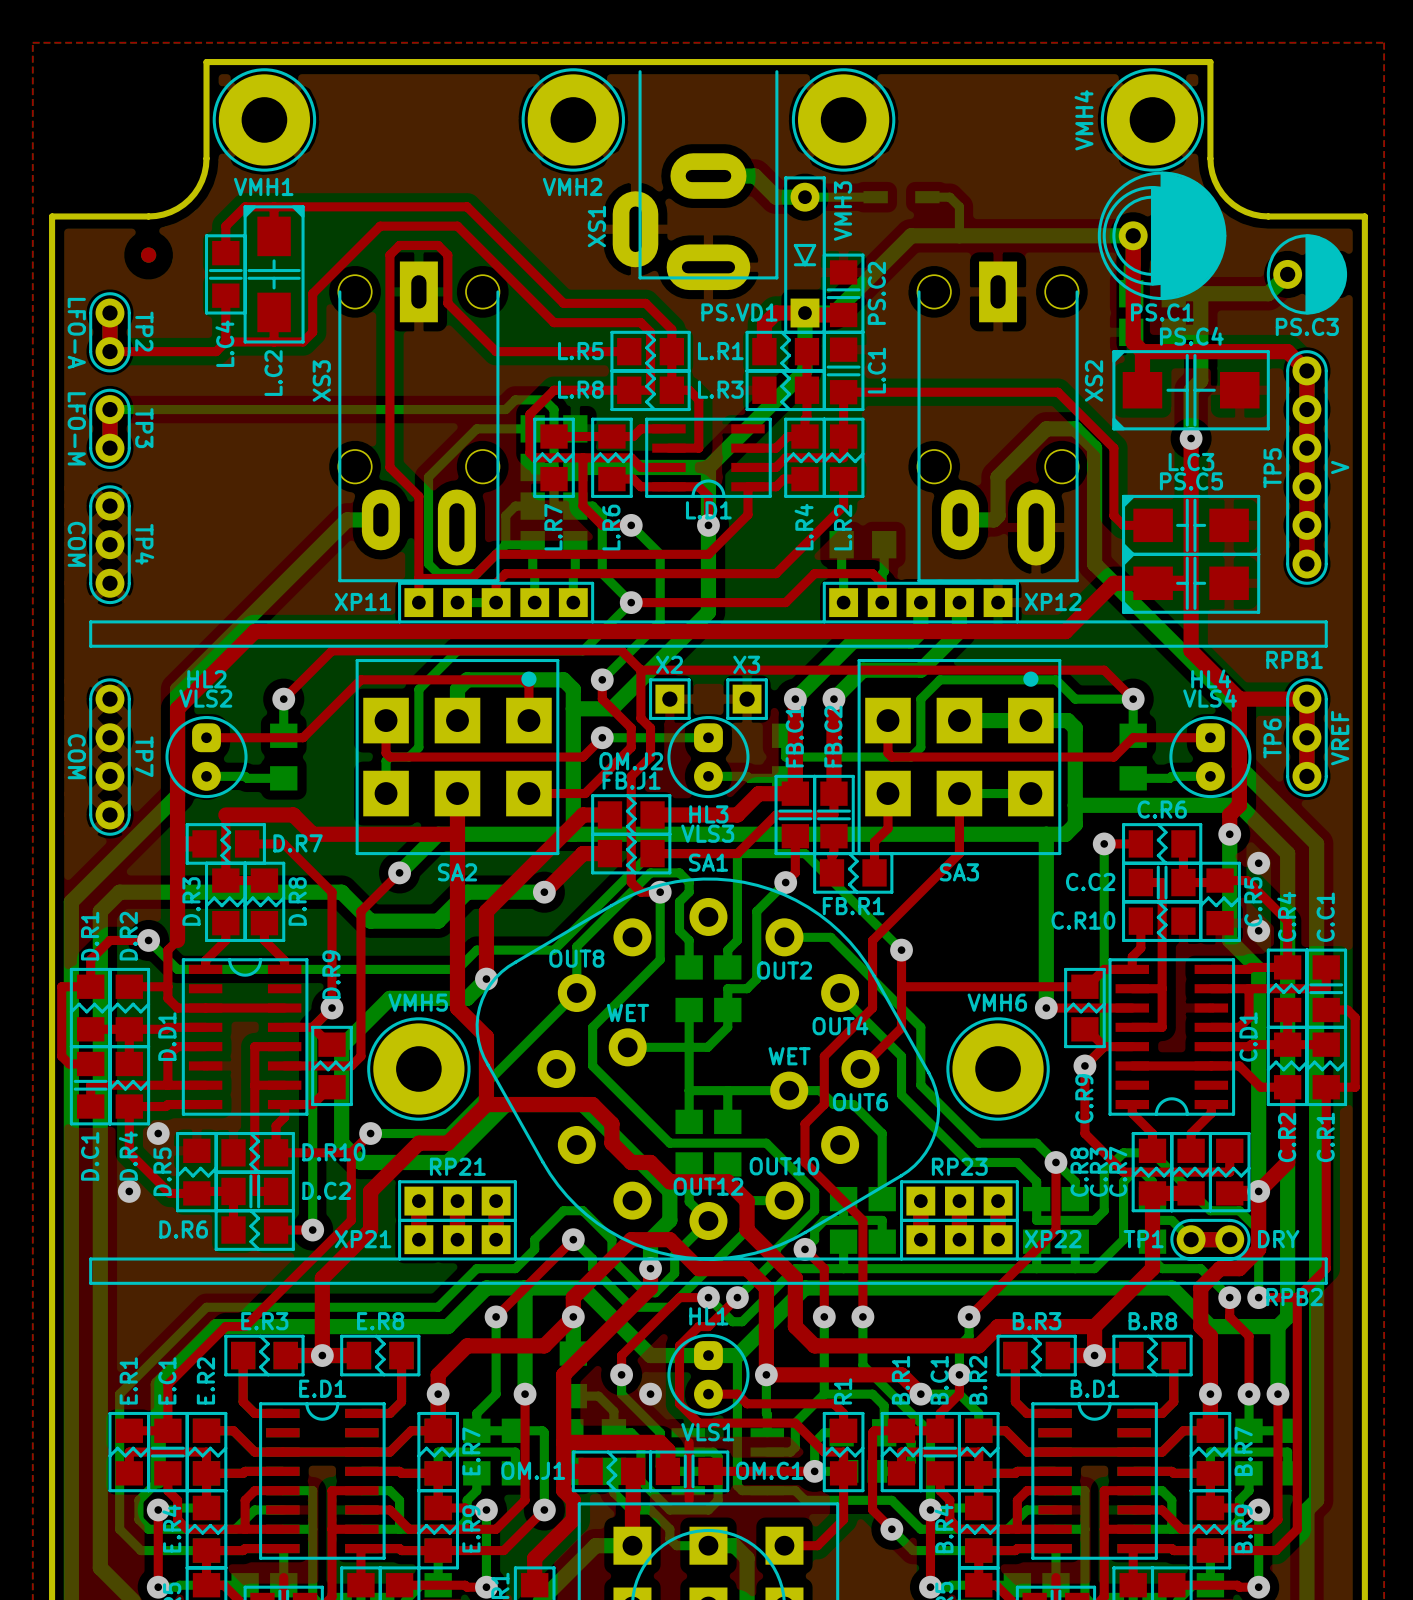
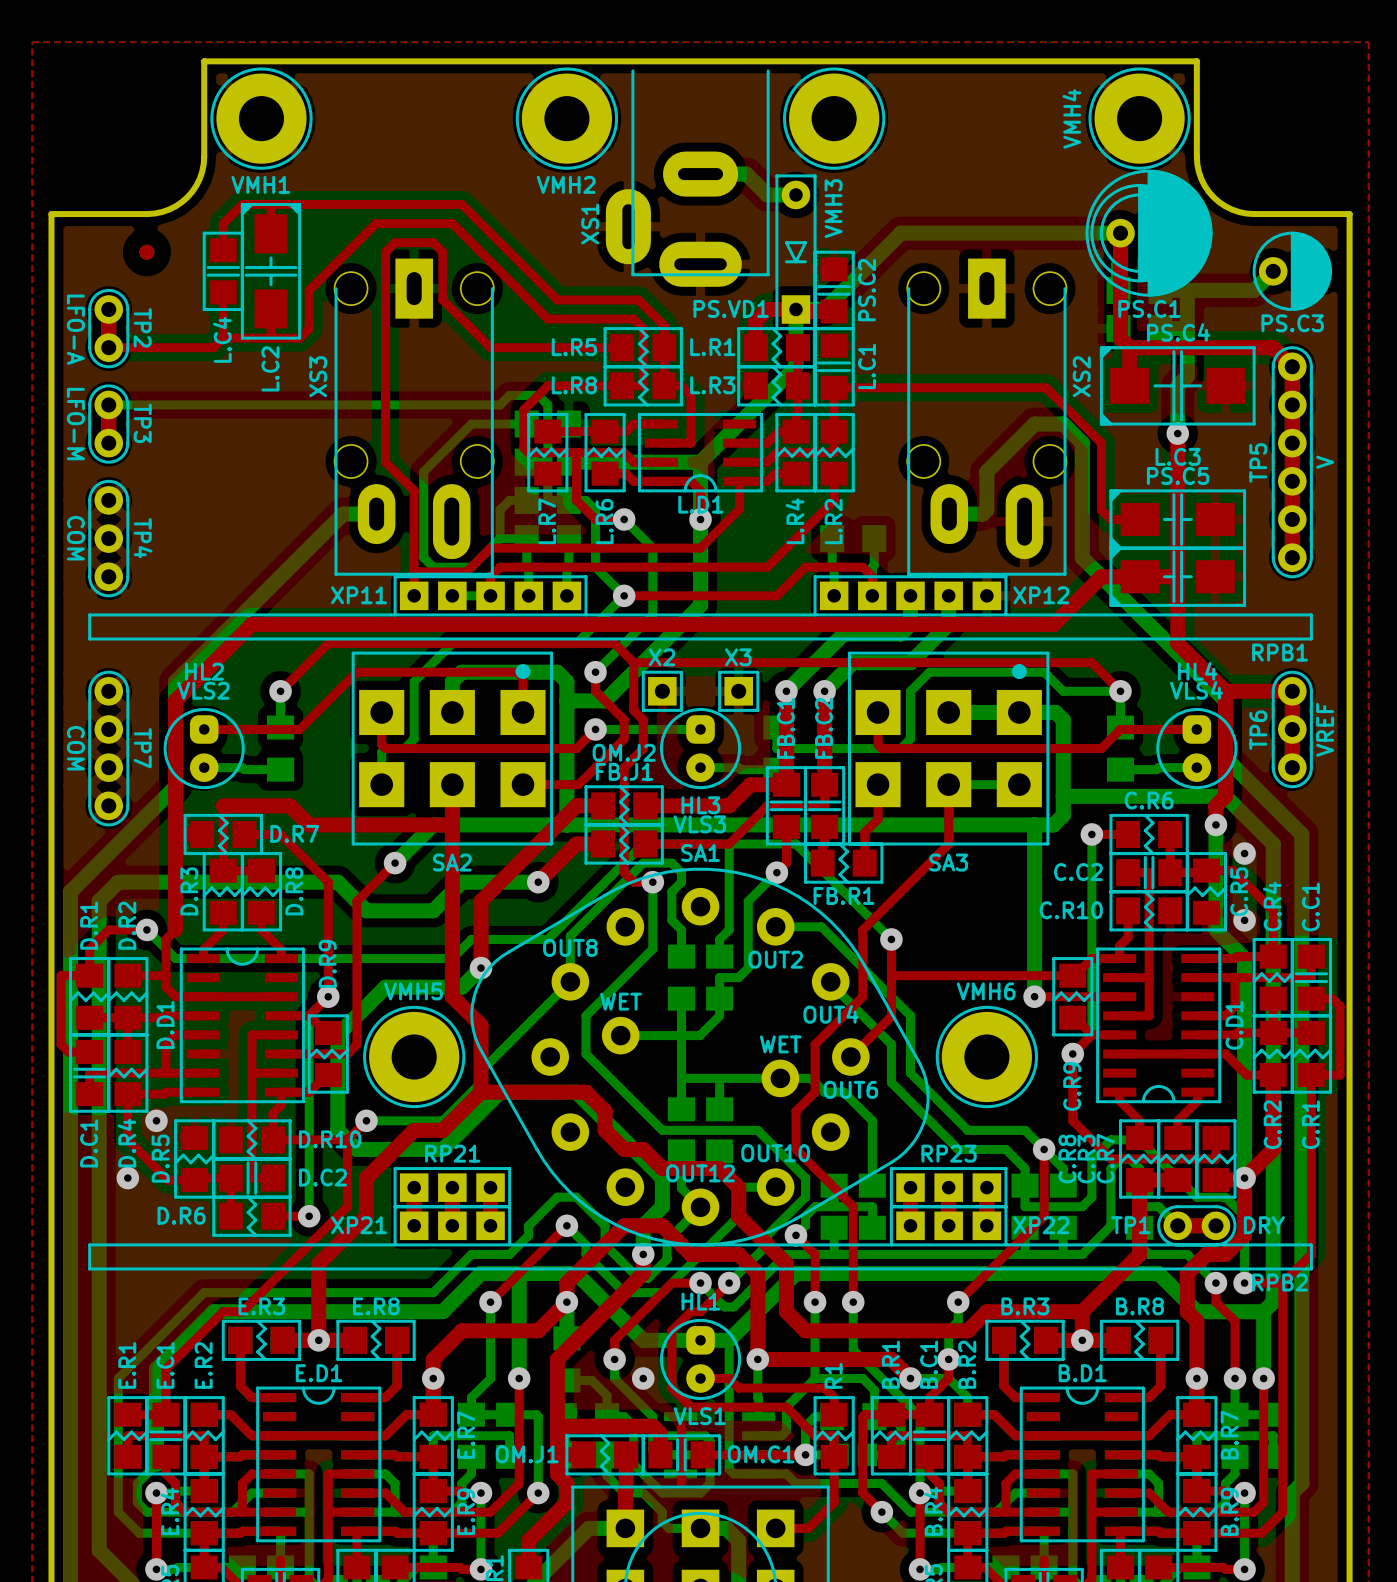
bottom track: (805, 197) (875, 197) -> none
bottom track: (927, 197) (949, 197) (959, 206) (959, 235) -> none

